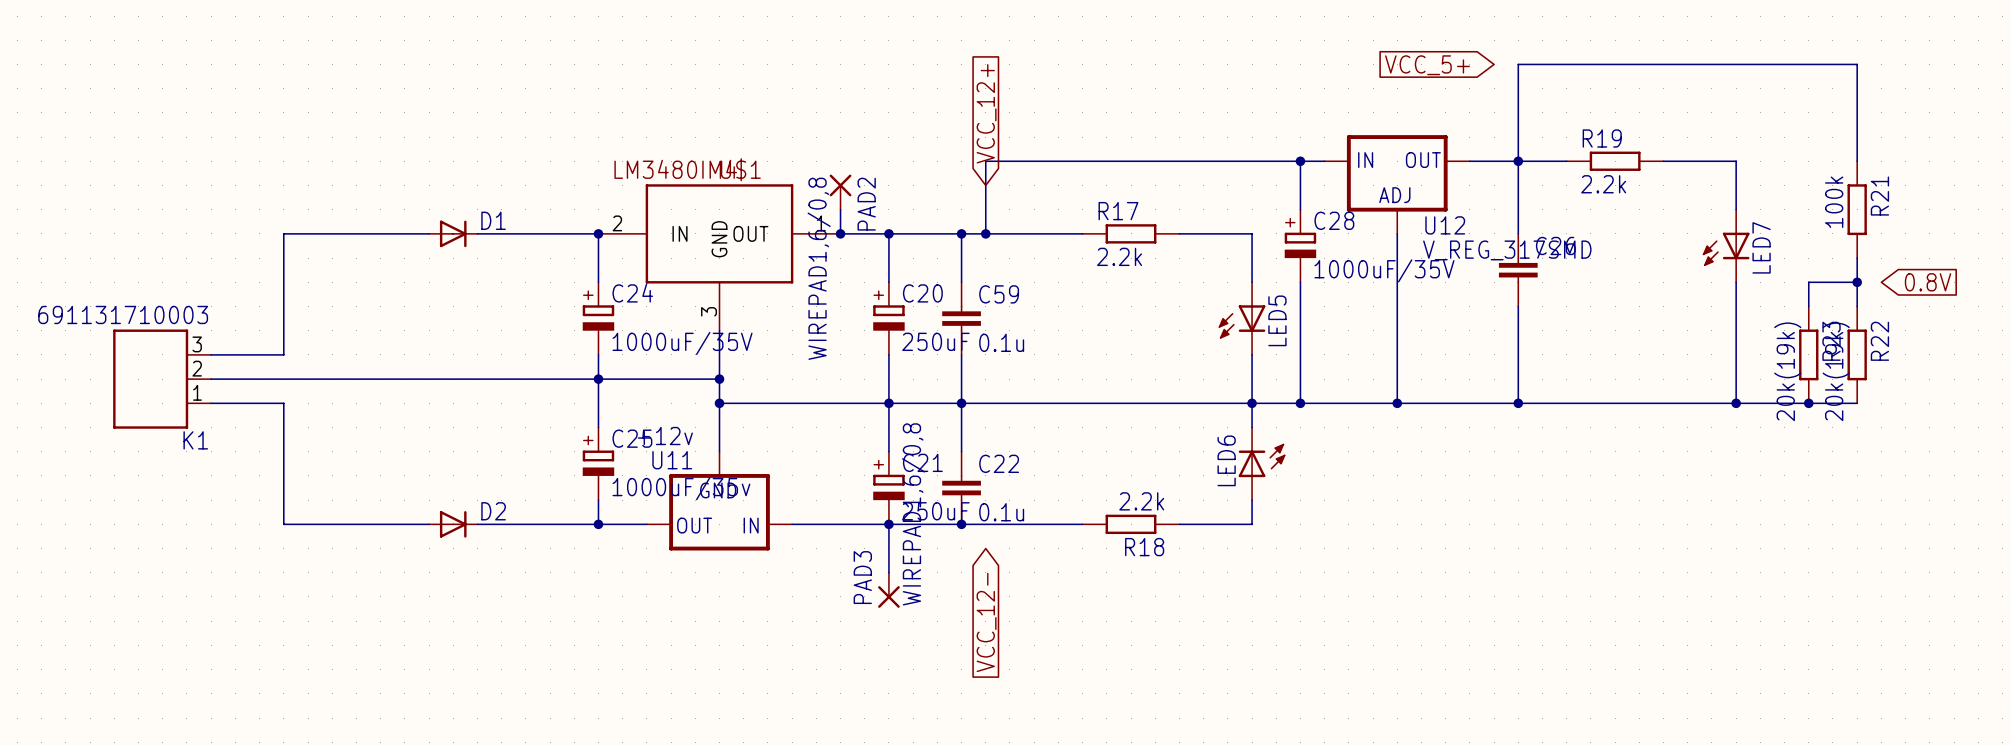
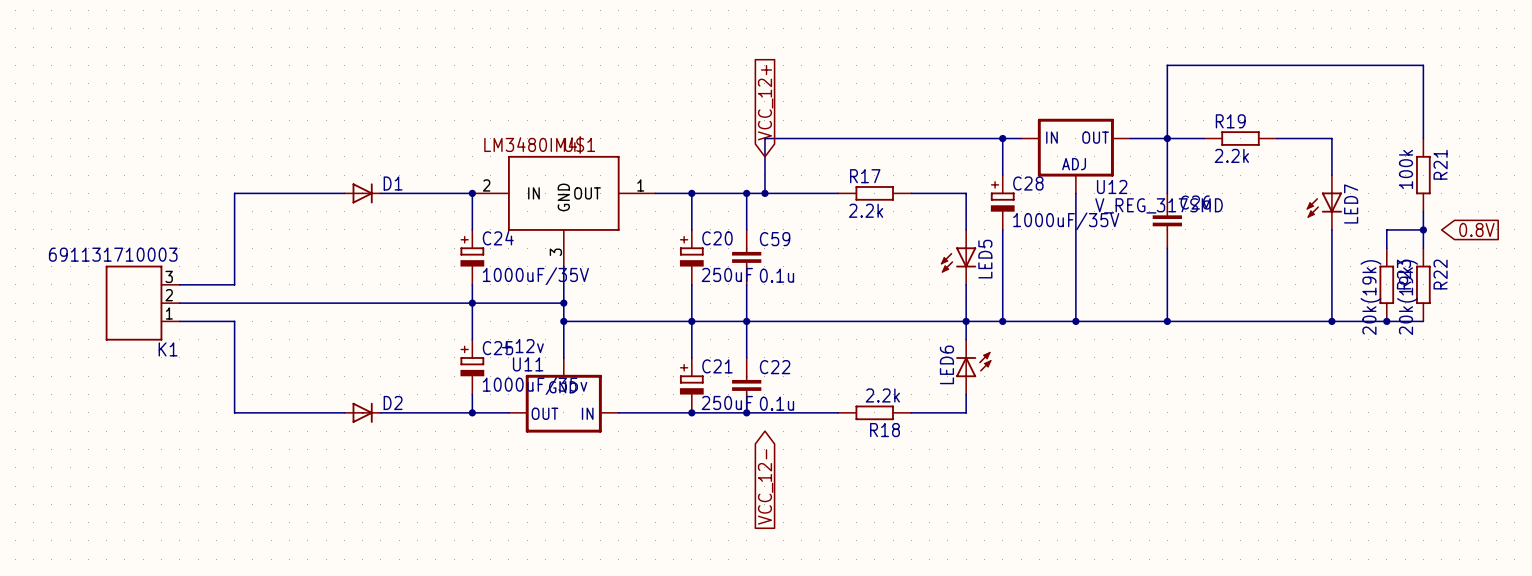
global label: VCC_5+ (1427, 65) -> none
PAD2: WIREPAD1,6/0,8 (840, 192) -> none
wire: (840, 209) (840, 233) -> none
junction: (840, 233) -> none
wire: (888, 524) (888, 572) -> none
PAD3: WIREPAD1,6/0,8 (888, 590) -> none

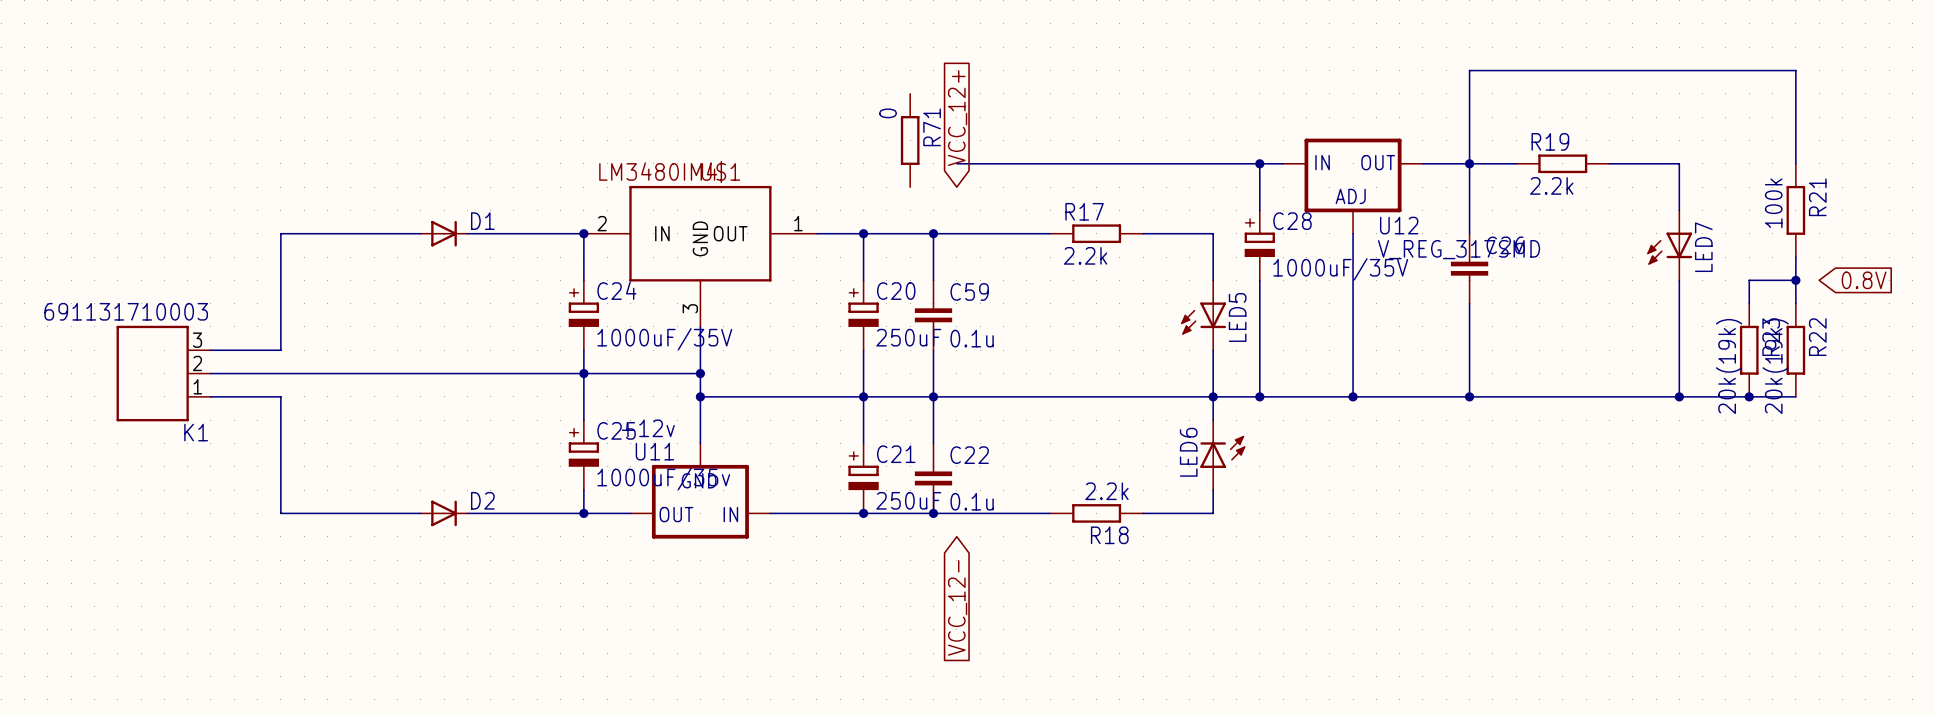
R71: none -> 0 (910, 140)
wire: (764, 138) (764, 193) -> none
junction: (764, 193) -> none

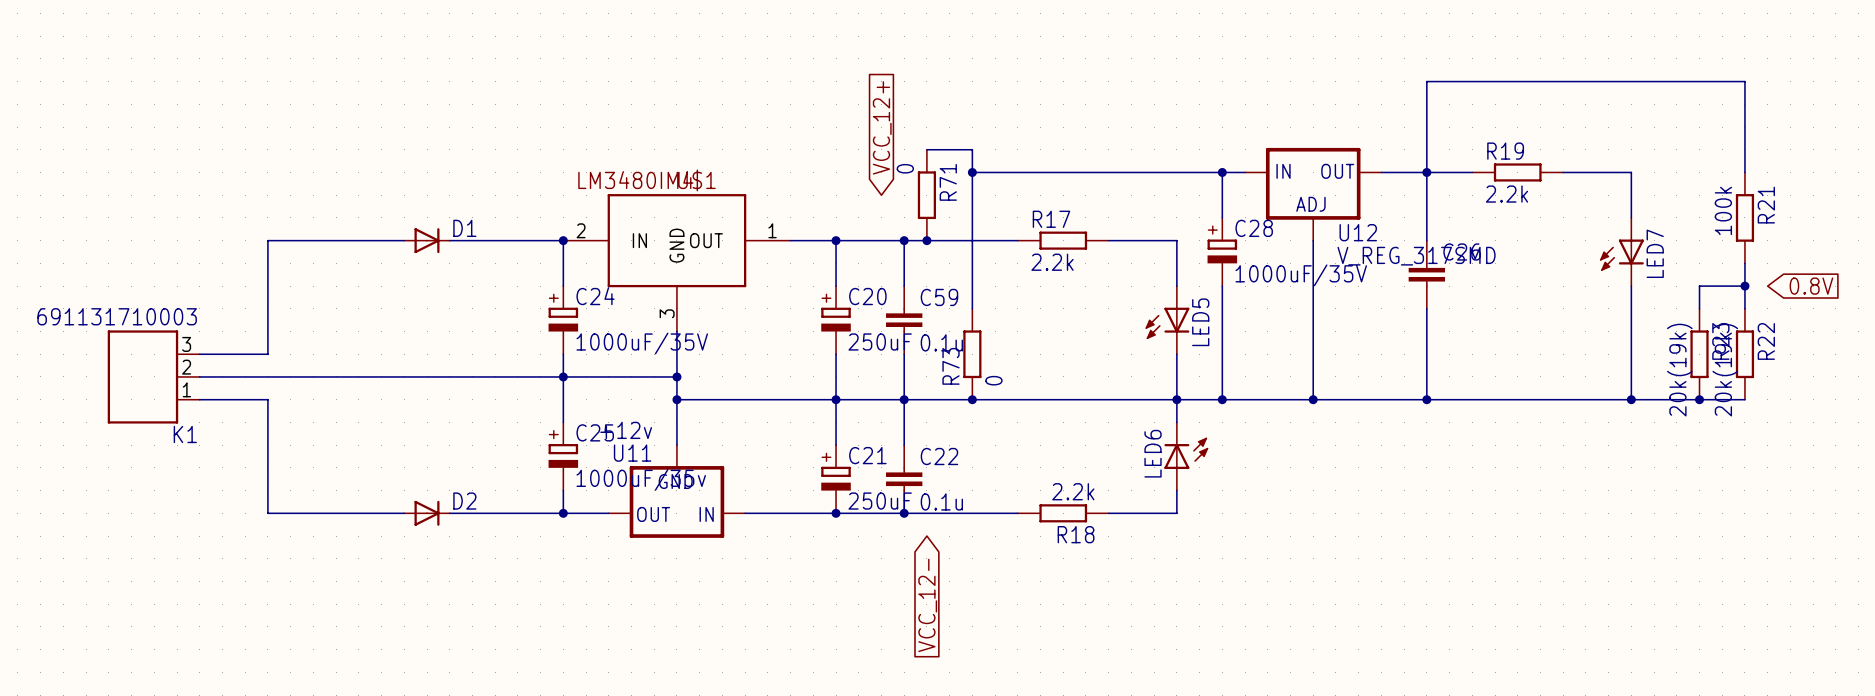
global label position: VCC_12+ (957, 118) -> VCC_12+ (882, 127)
R71 position: (910, 140) -> (926, 195)
wire: none -> (926, 149) (972, 149) (972, 308)
wire: (956, 163) (1003, 163) -> none
junction: none -> (972, 172)
junction: none -> (926, 240)
R73: none -> 0 (972, 354)
junction: none -> (972, 399)

